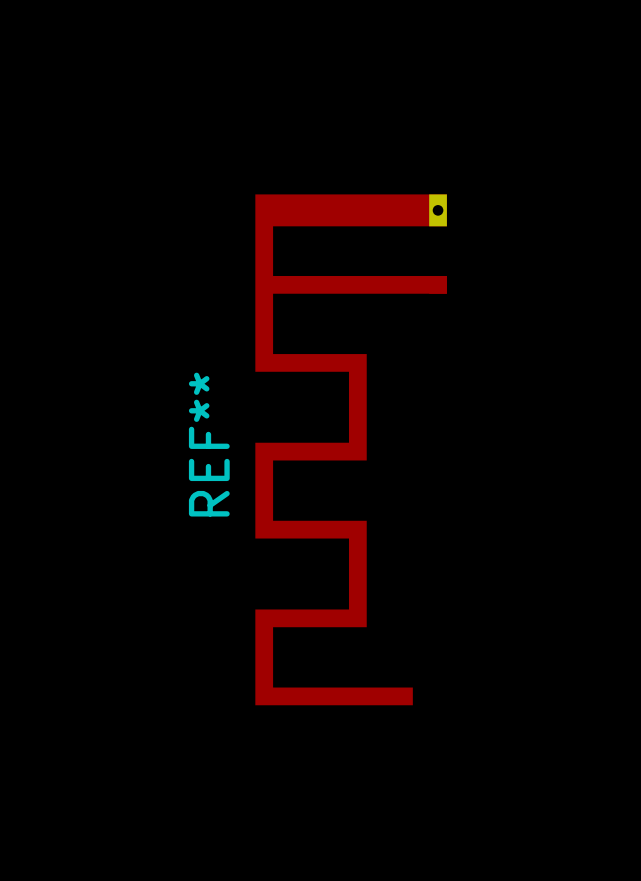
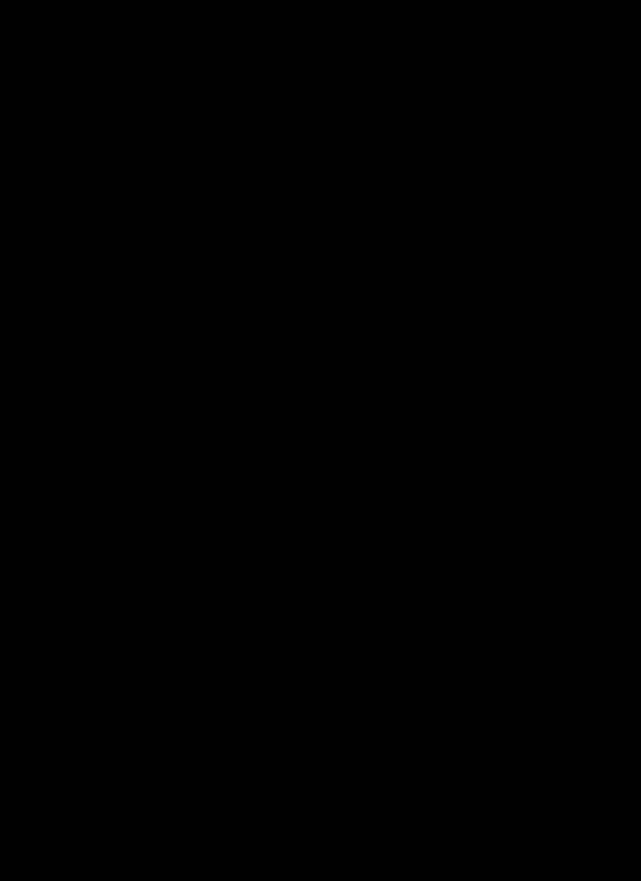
REF**: (351, 449) -> none

